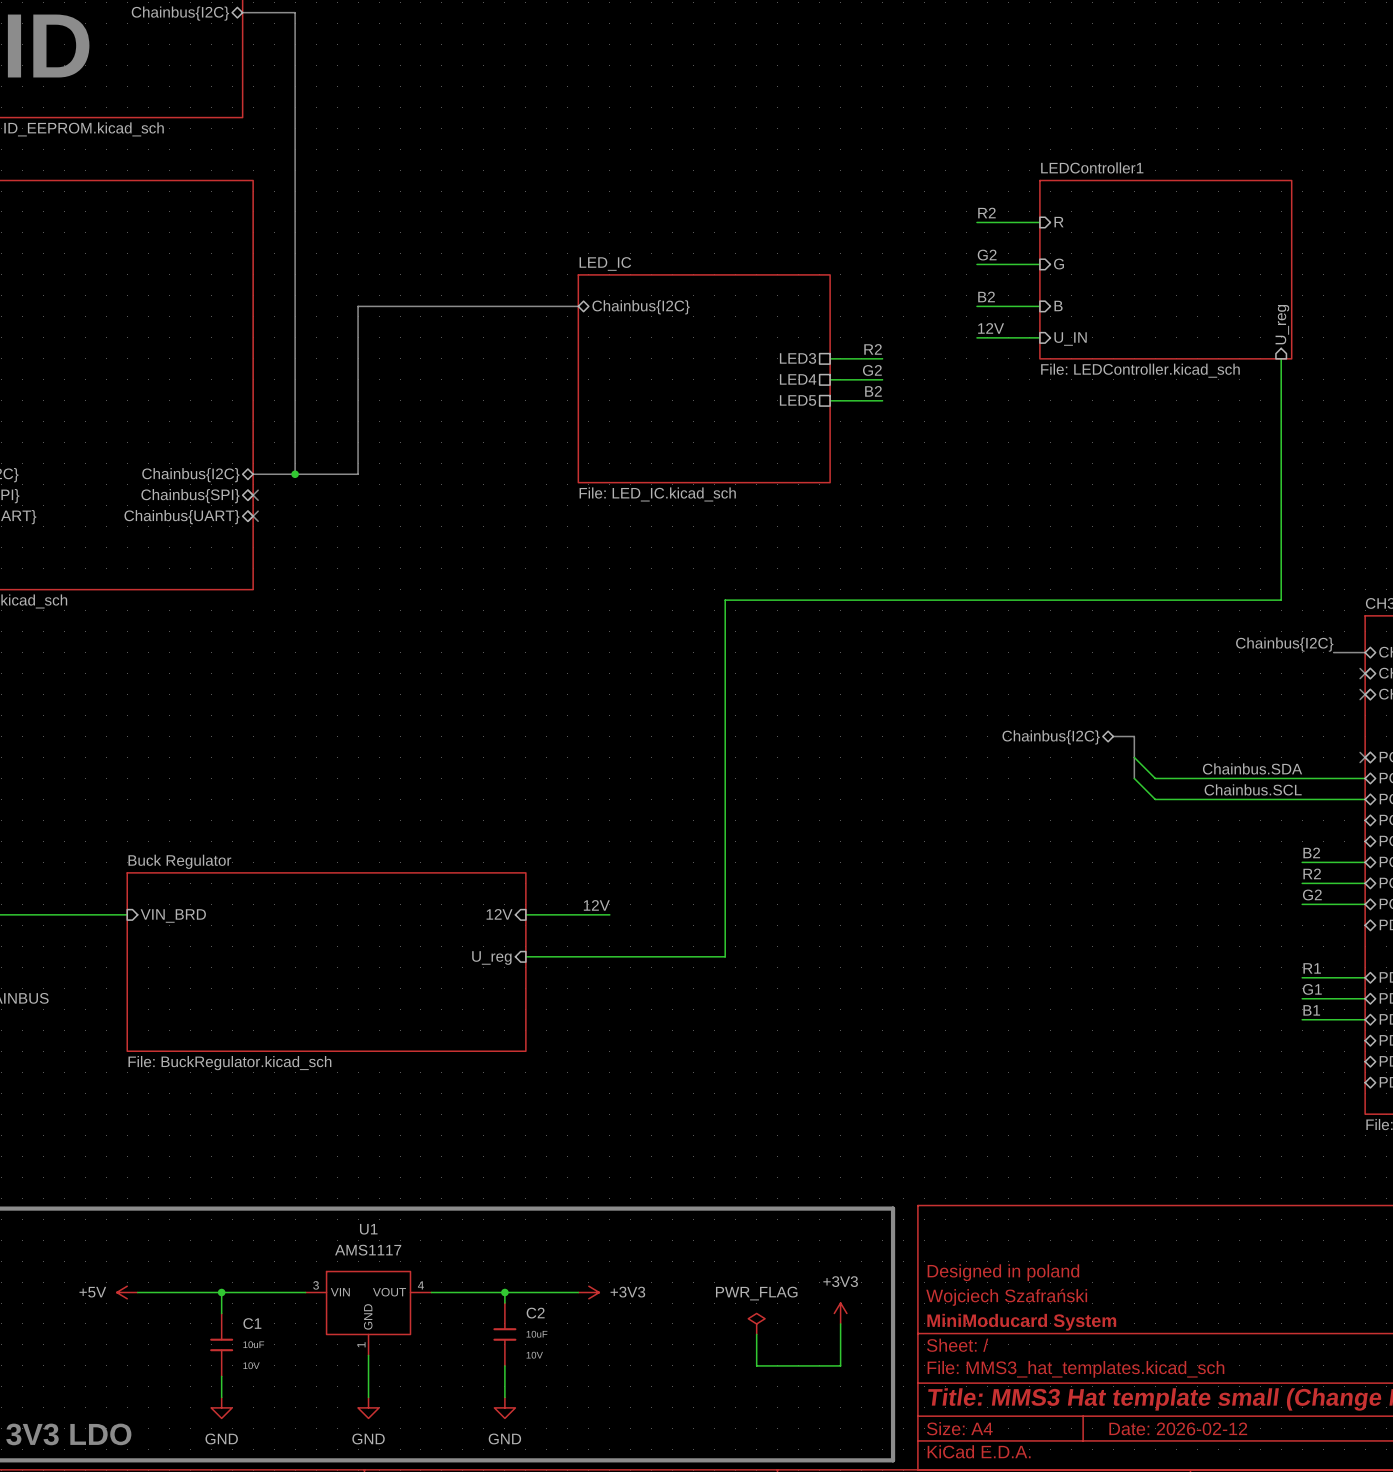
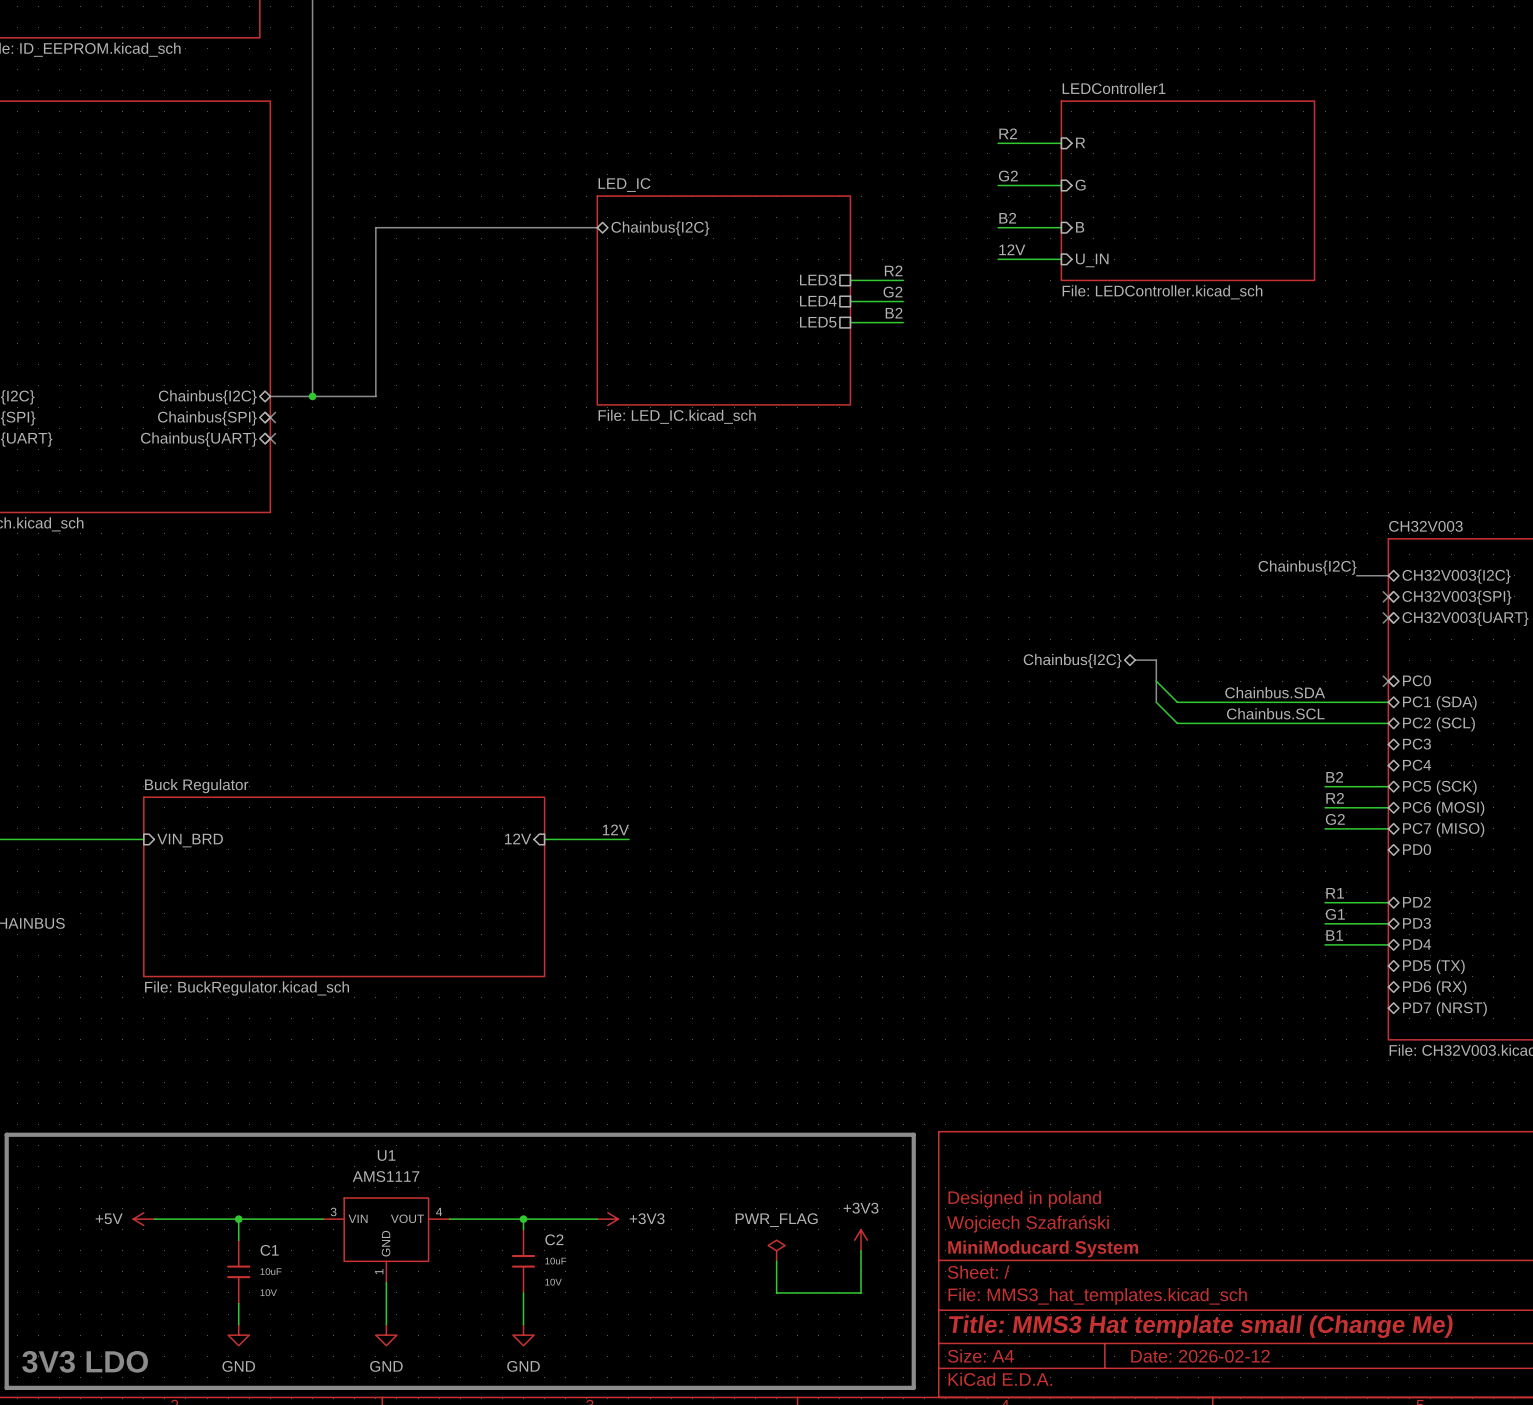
sheet pin: U_reg (1282, 324) -> none
wire: (1281, 358) (1281, 600) (725, 600) (725, 956) (525, 956) -> none
sheet pin: U_reg (491, 958) -> none

